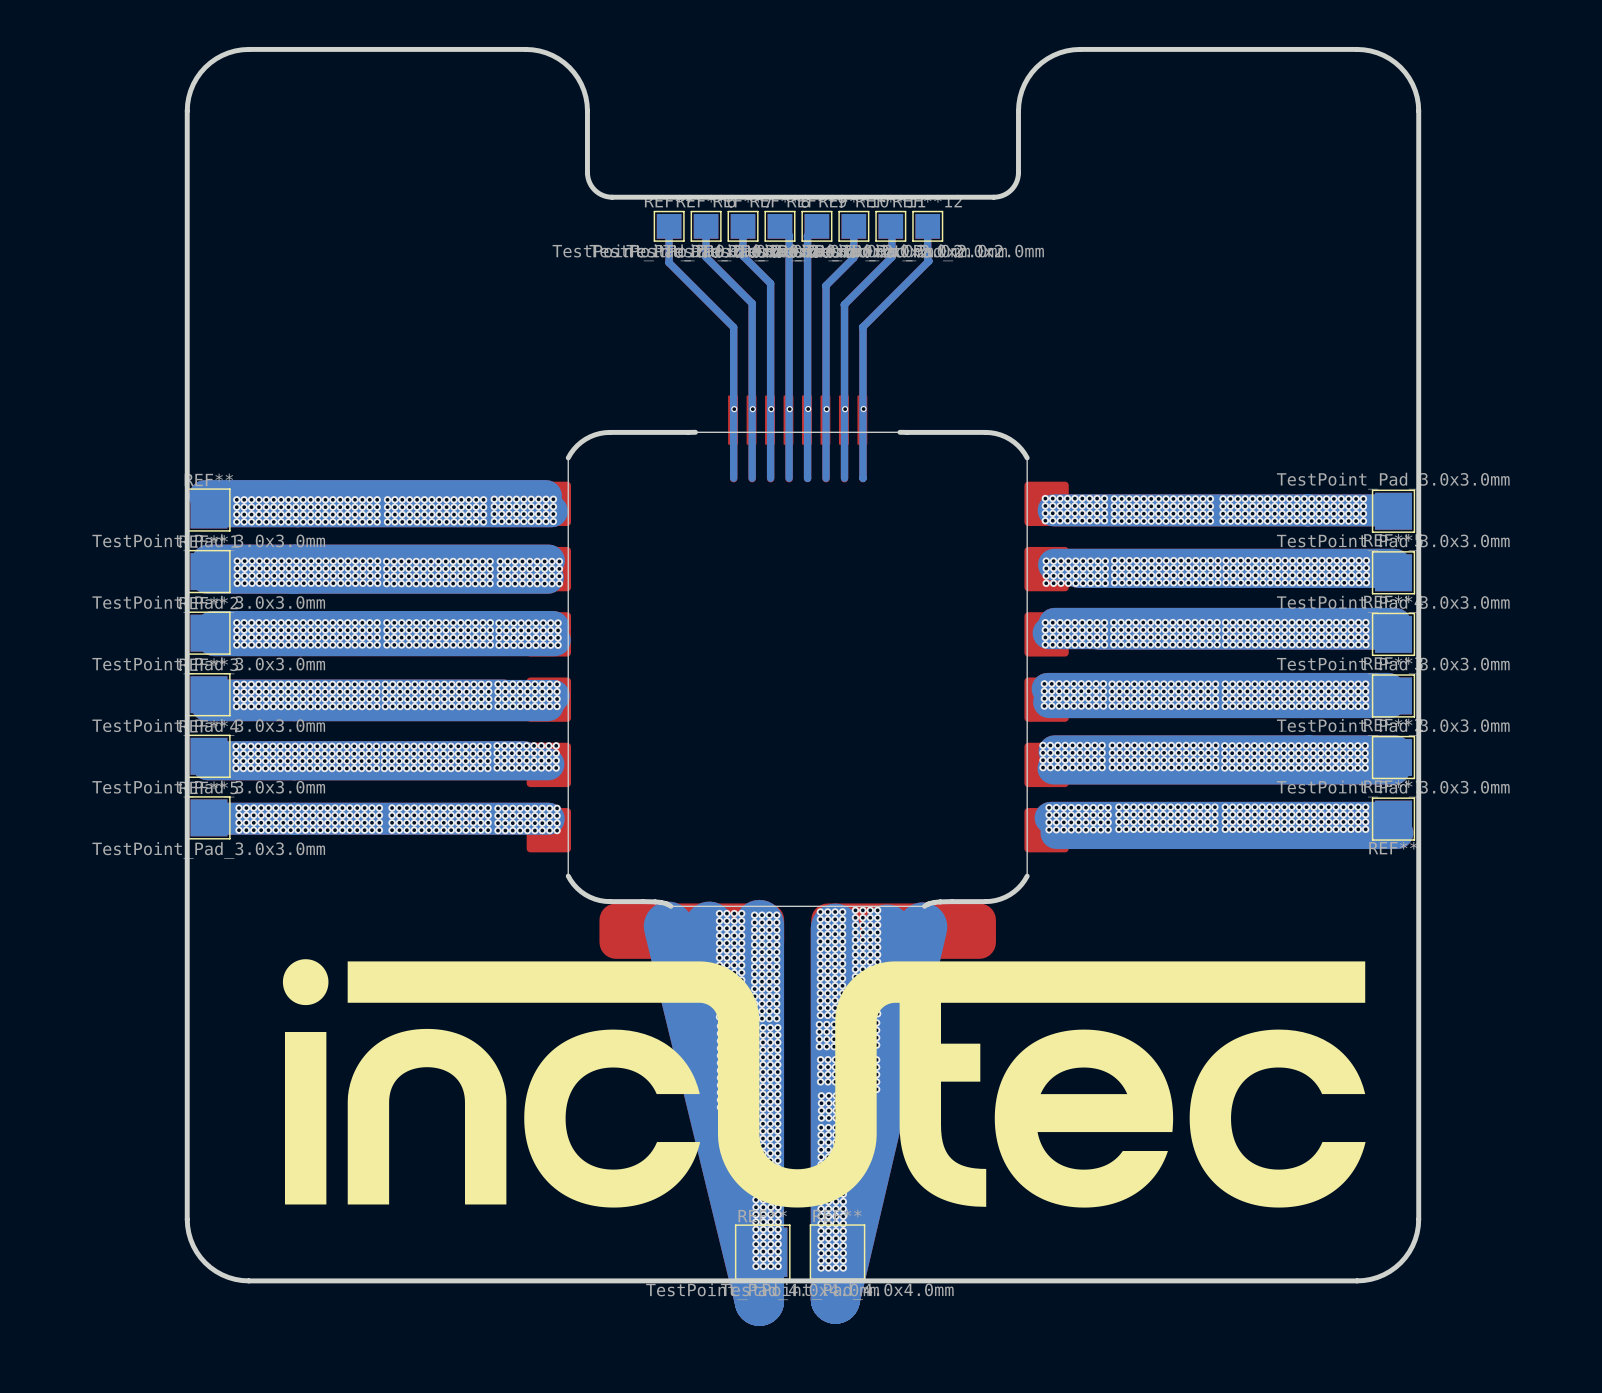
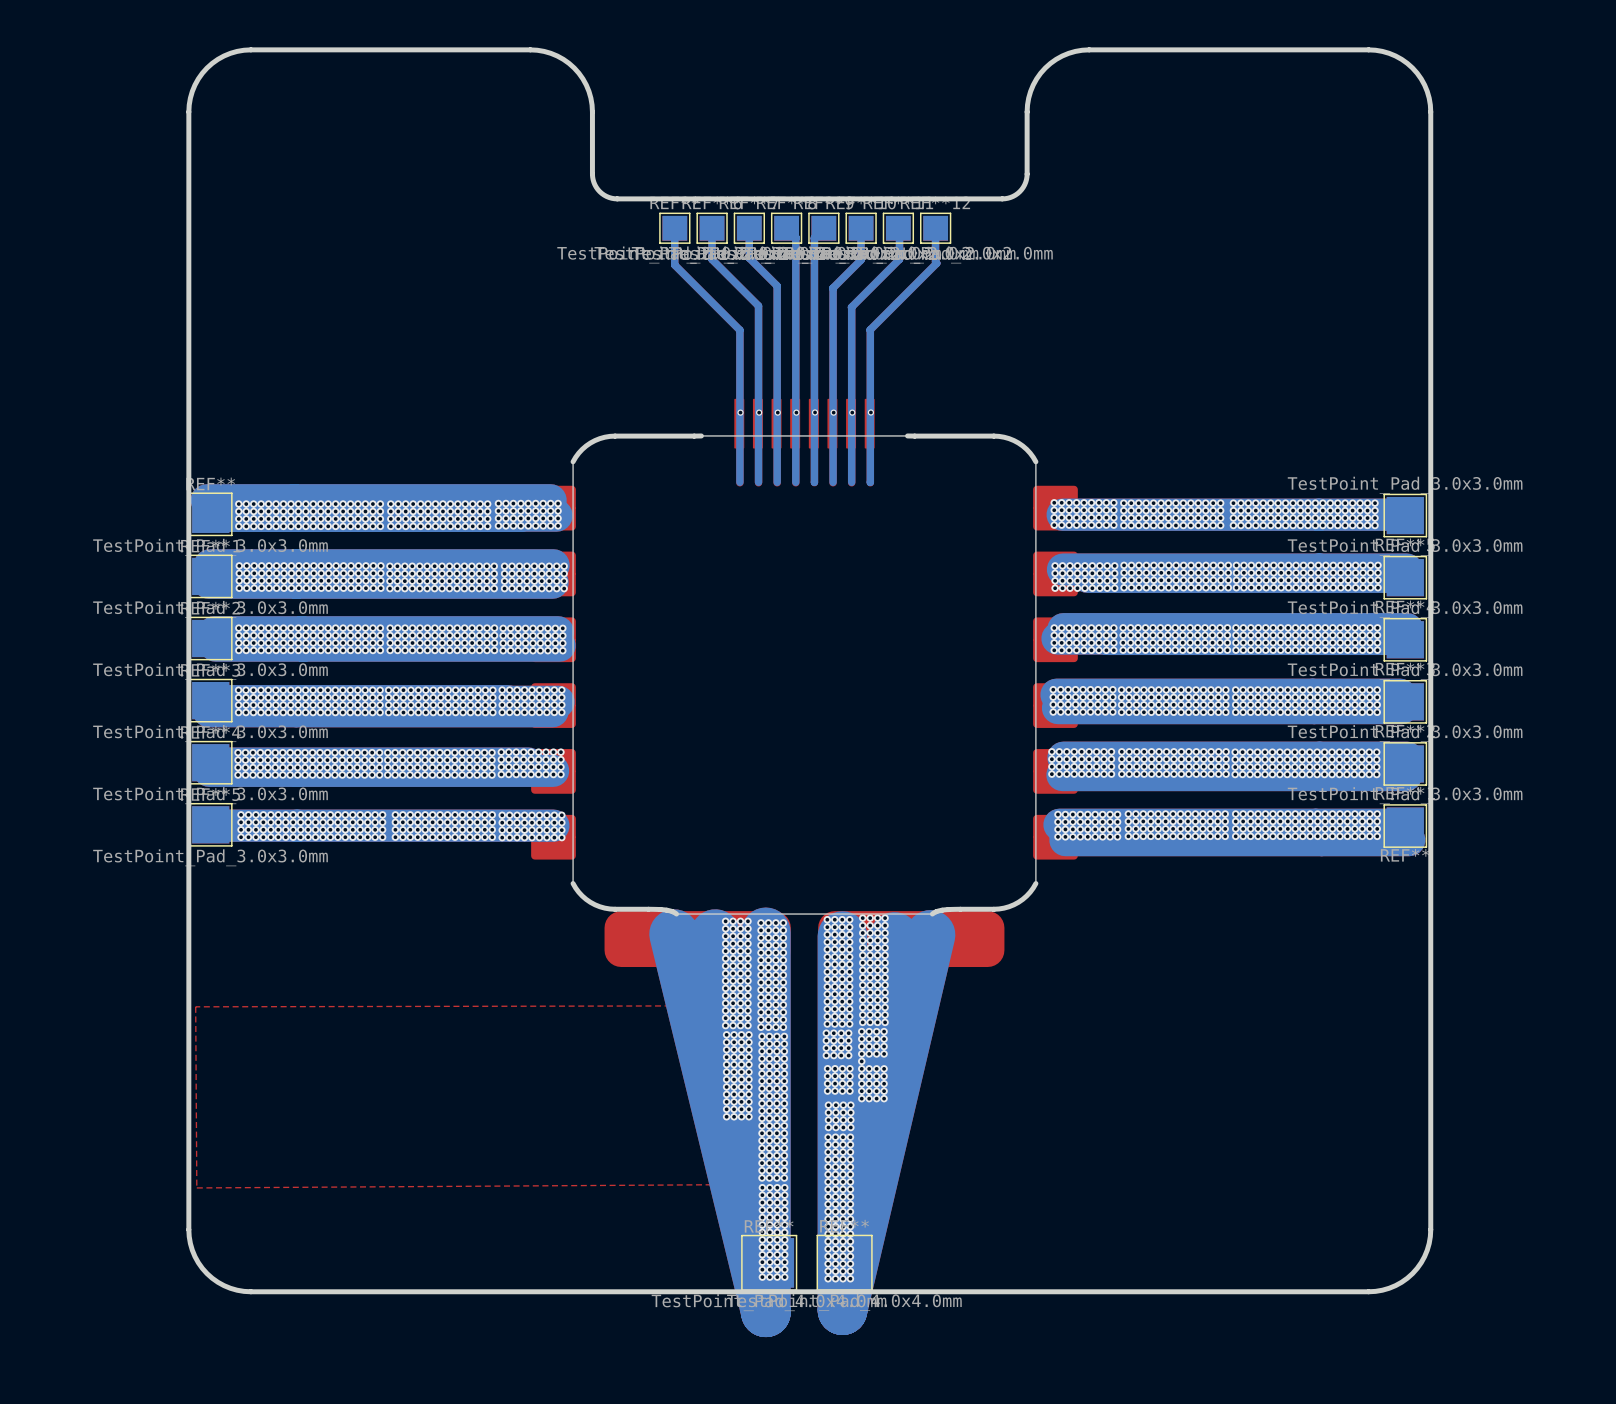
drawing: [282, 959, 329, 1006] -> none
drawing: [347, 961, 1366, 1208] -> none
top zone outline: none -> (728, 1005) (195, 1006) (196, 1187) (729, 1184) (728, 1005)
drawing: [284, 1032, 327, 1205] -> none

